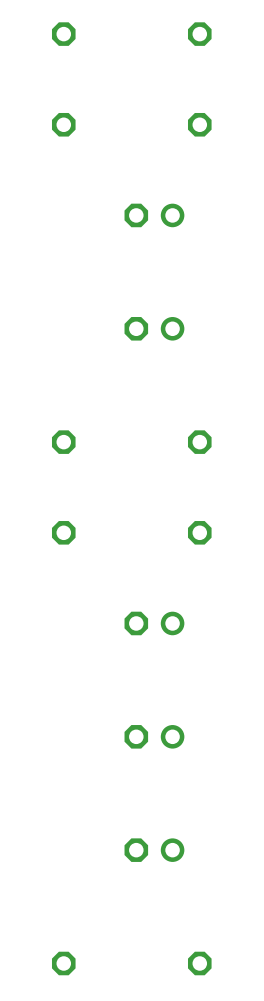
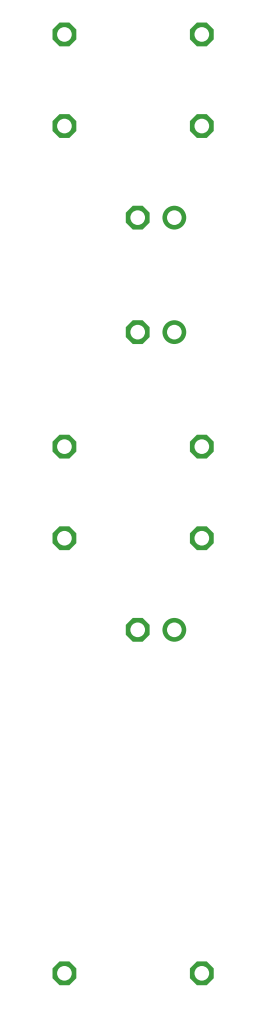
part: (154, 736) -> none
part: (154, 850) -> none

